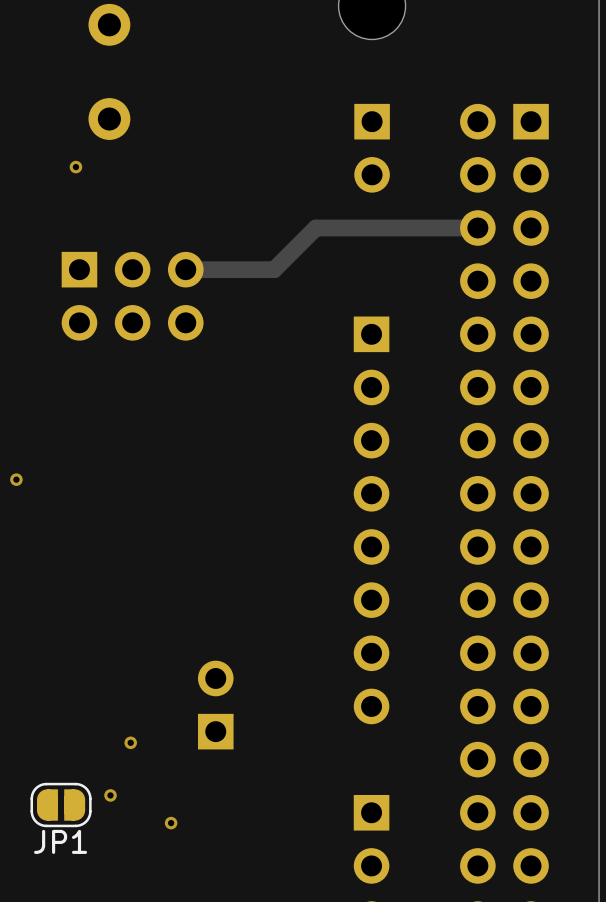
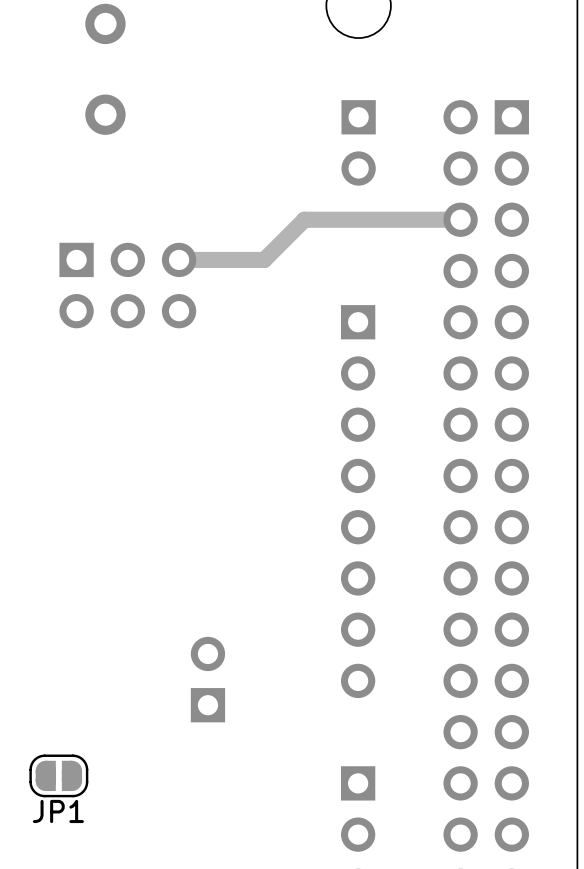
via: (75, 167) -> none
via: (16, 479) -> none
via: (130, 742) -> none
via: (110, 795) -> none
via: (171, 823) -> none

